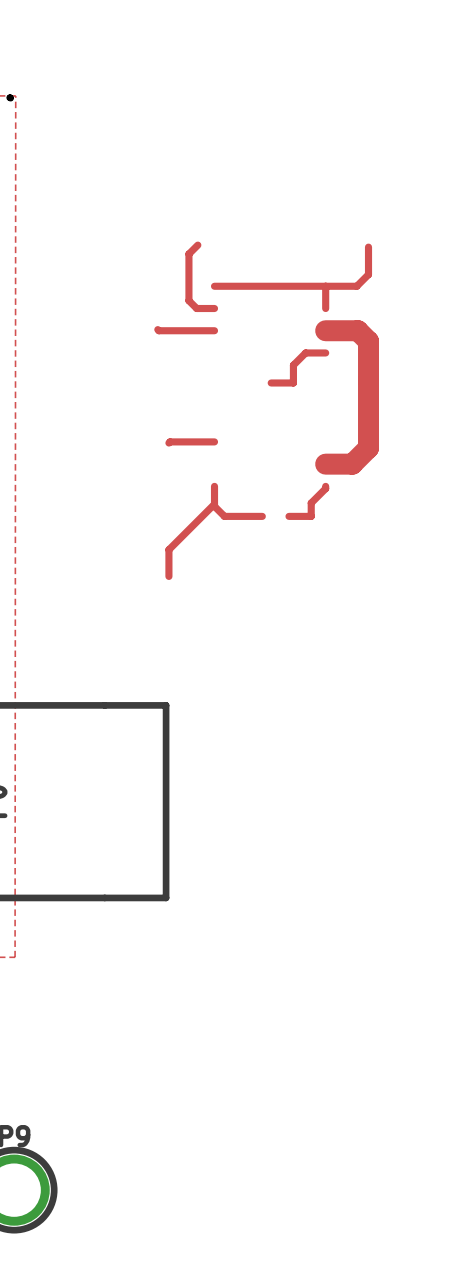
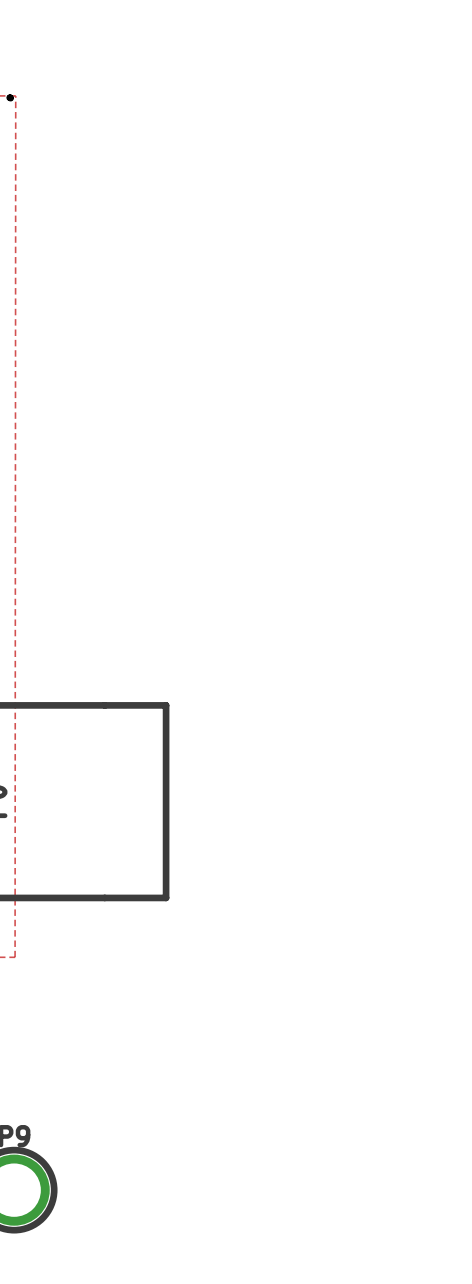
track: (197, 245) (188, 254) (188, 300) (196, 308) (214, 308) -> none
track: (368, 247) (368, 274) (356, 286) (214, 286) -> none
track: (325, 286) (325, 308) -> none
track: (157, 329) (214, 330) -> none
track: (325, 330) (357, 330) (368, 341) (368, 448) (352, 464) (325, 464) -> none
track: (325, 352) (305, 352) (293, 365) (293, 382) (271, 382) -> none
track: (214, 441) (168, 443) -> none
track: (214, 486) (214, 506) (224, 516) (262, 516) -> none
track: (325, 486) (311, 503) (311, 516) (288, 516) -> none
track: (214, 504) (168, 549) (168, 576) -> none

